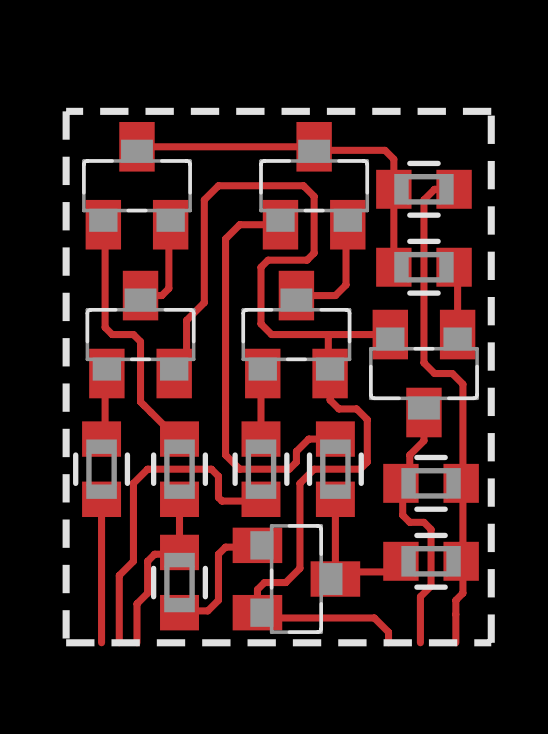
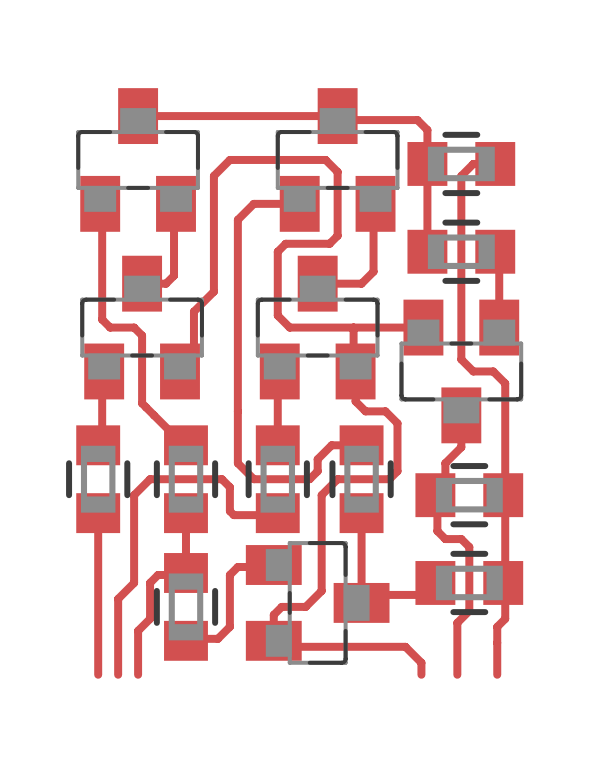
line: (66, 111) (491, 111) (491, 642) (66, 642) (66, 111) -> none

